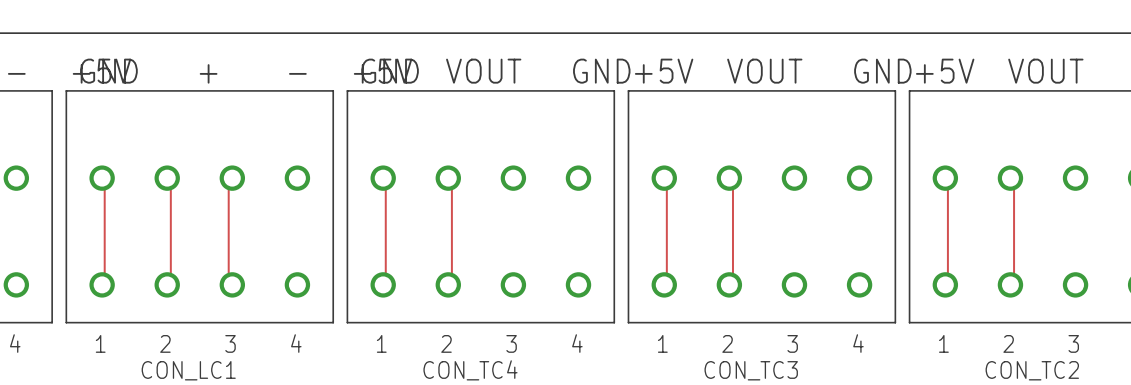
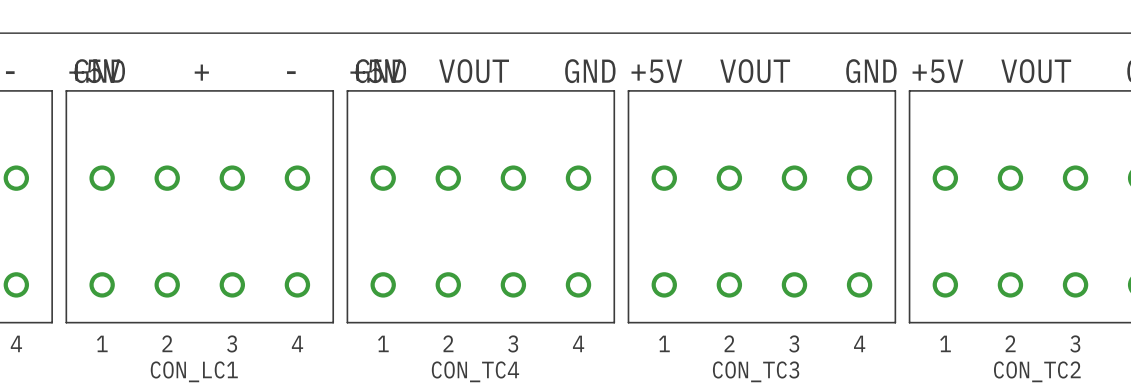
track: (102, 178) (104, 181) (104, 281) (102, 284) -> none
track: (167, 178) (170, 181) (170, 281) (167, 284) -> none
track: (232, 178) (228, 181) (228, 281) (232, 284) -> none
track: (383, 178) (385, 181) (385, 281) (383, 284) -> none
track: (448, 178) (451, 181) (451, 281) (448, 284) -> none
track: (664, 178) (666, 181) (666, 281) (664, 284) -> none
track: (729, 178) (732, 181) (732, 281) (729, 284) -> none
track: (945, 178) (947, 181) (947, 281) (945, 284) -> none
track: (1010, 178) (1014, 181) (1014, 281) (1010, 284) -> none

